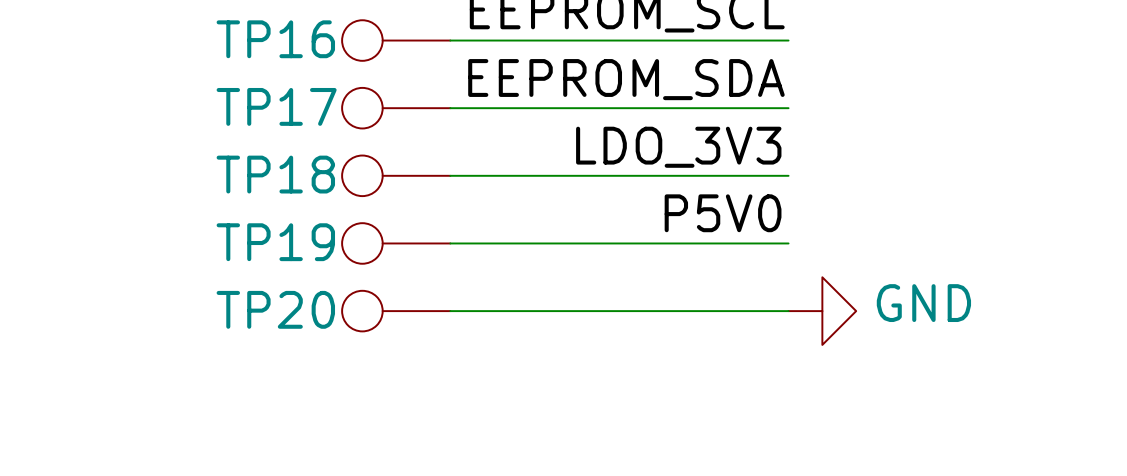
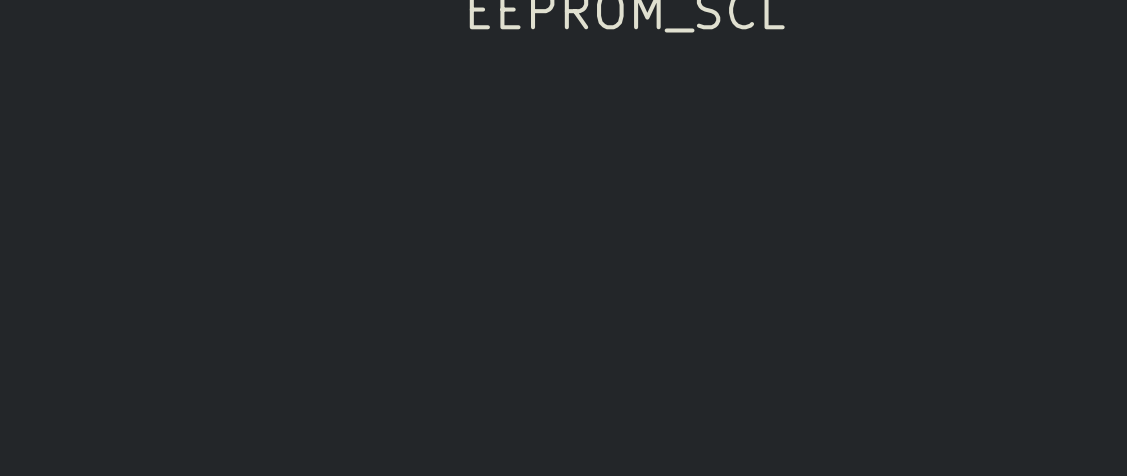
TP16: (396, 40) -> none
wire: (450, 40) (788, 40) -> none
label: EEPROM_SDA (626, 79) -> none
TP17: (396, 108) -> none
wire: (450, 108) (788, 108) -> none
label: LDO_3V3 (678, 147) -> none
TP18: (396, 175) -> none
wire: (450, 175) (788, 175) -> none
label: P5V0 (723, 213) -> none
TP19: (396, 243) -> none
wire: (450, 243) (788, 243) -> none
TP20: (396, 311) -> none
wire: (450, 311) (788, 311) -> none
power symbol: GND (822, 311) -> none

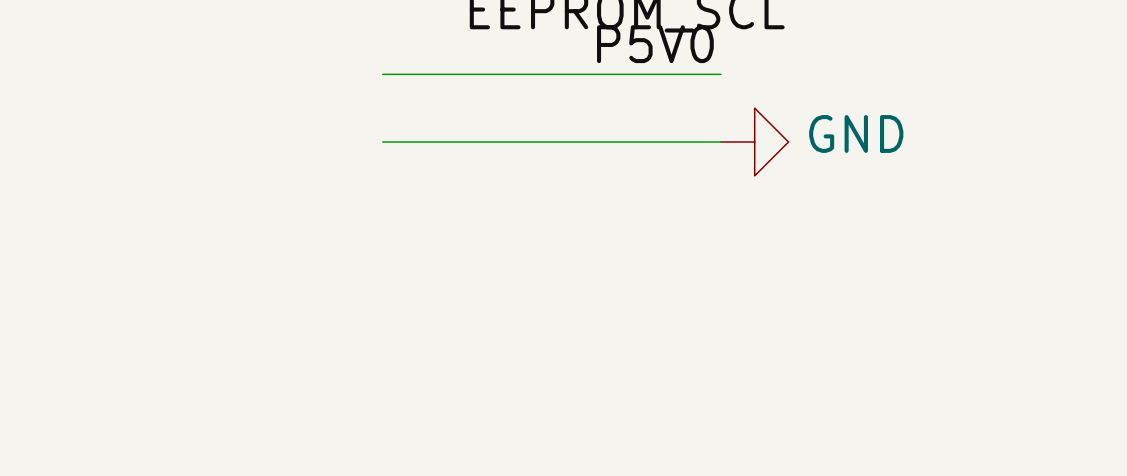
label: none -> P5V0 (655, 44)
wire: none -> (382, 74) (720, 74)
wire: none -> (382, 142) (720, 142)
power symbol: none -> GND (754, 142)

